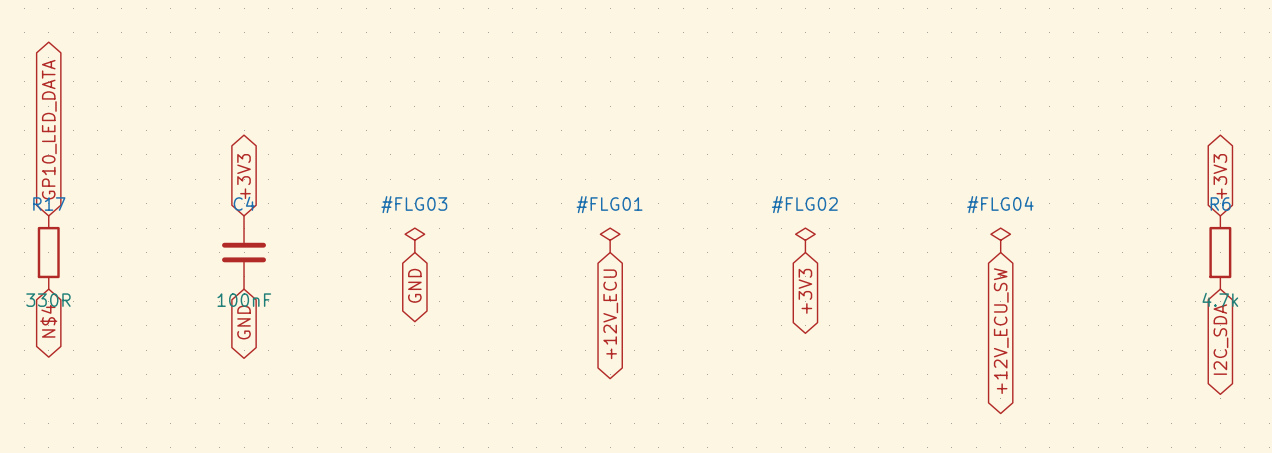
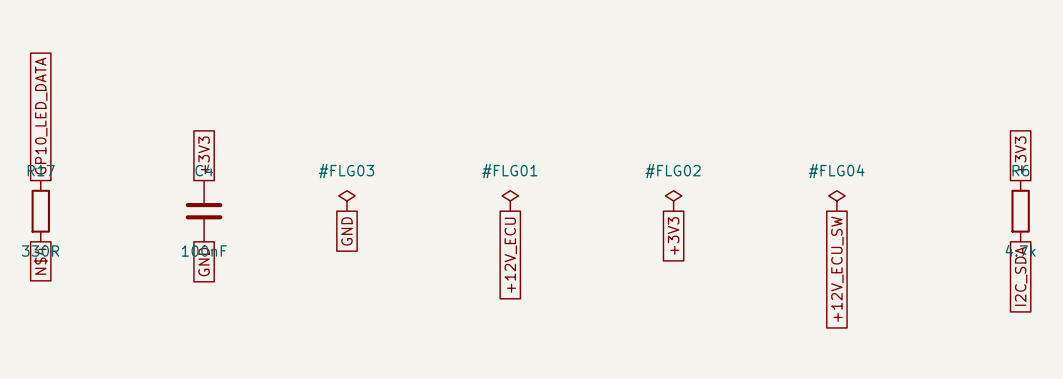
global label shape: bidirectional (49, 129) -> passive (41, 116)
global label shape: bidirectional (244, 176) -> passive (204, 155)
global label shape: bidirectional (1220, 176) -> passive (1020, 155)
global label shape: bidirectional (414, 285) -> passive (346, 231)
global label shape: bidirectional (805, 291) -> passive (673, 236)
global label shape: bidirectional (610, 314) -> passive (510, 255)
global label shape: bidirectional (48, 321) -> passive (40, 261)
global label shape: bidirectional (244, 322) -> passive (204, 262)
global label shape: bidirectional (1001, 331) -> passive (837, 269)
global label shape: bidirectional (1220, 339) -> passive (1021, 276)

